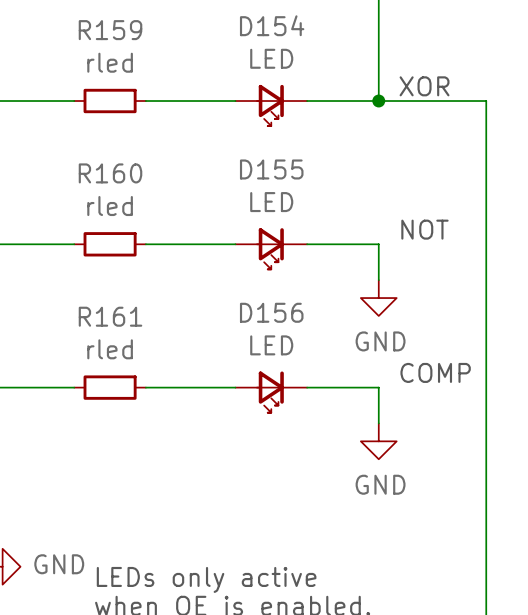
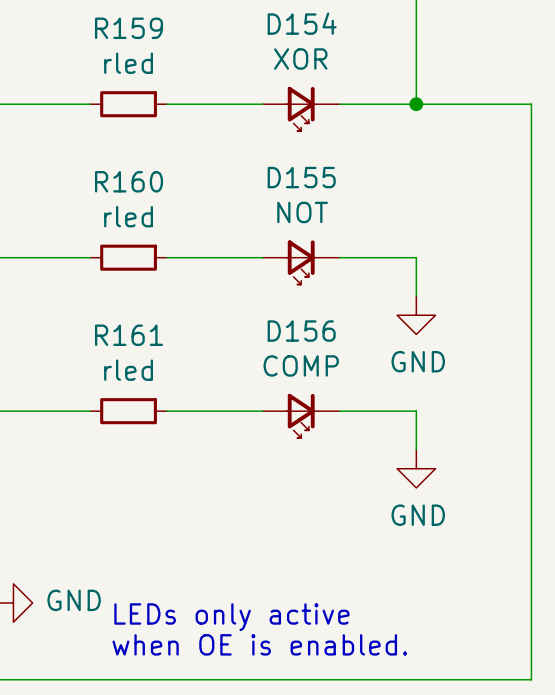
D154 value: LED (271, 58) -> XOR (300, 58)
text: XOR (424, 86) -> none
D155 value: LED (271, 202) -> NOT (302, 212)
text: NOT (424, 229) -> none
D156 value: LED (271, 345) -> COMP (301, 365)
text: COMP (435, 372) -> none

